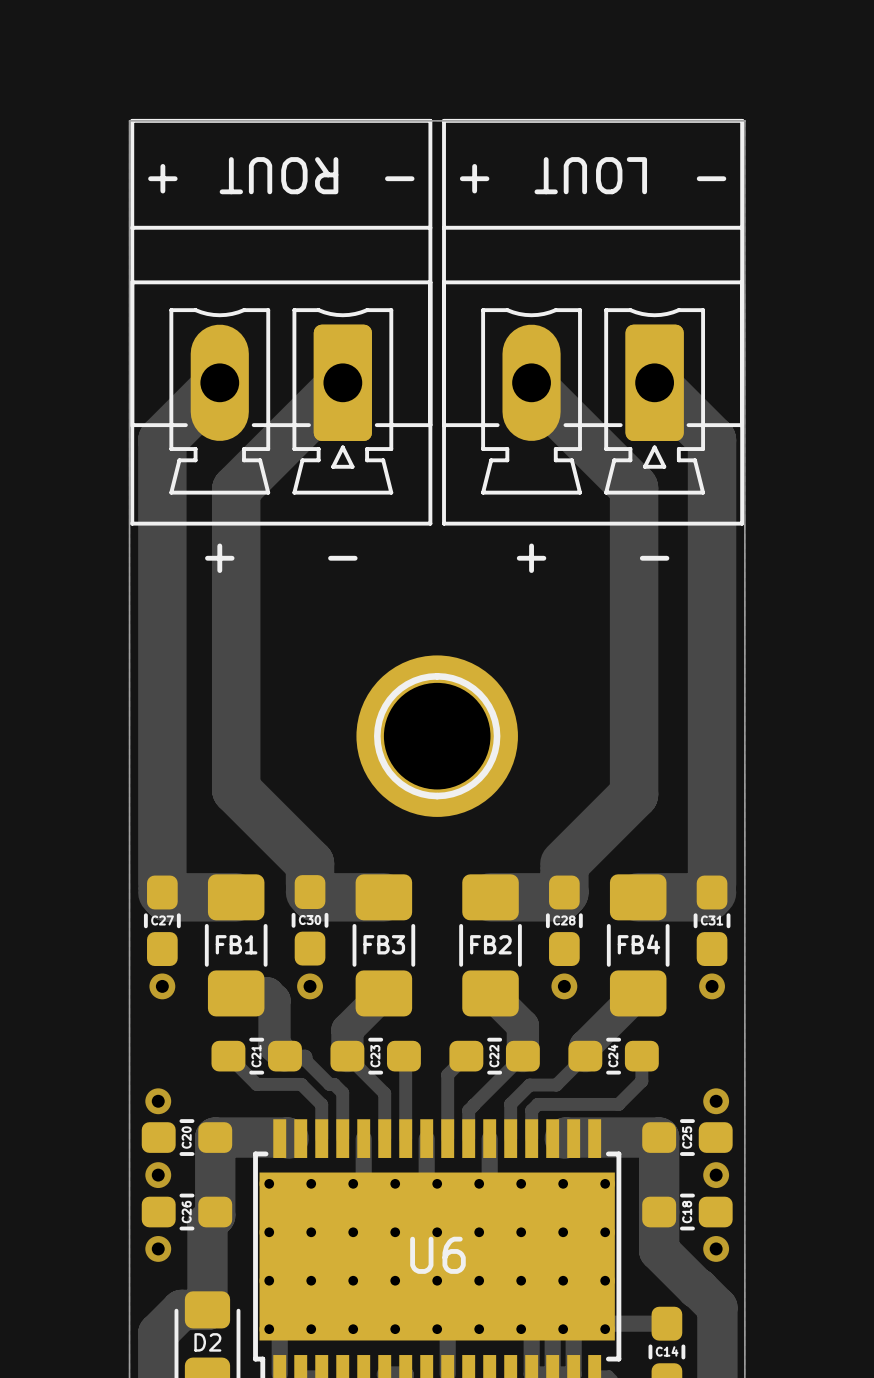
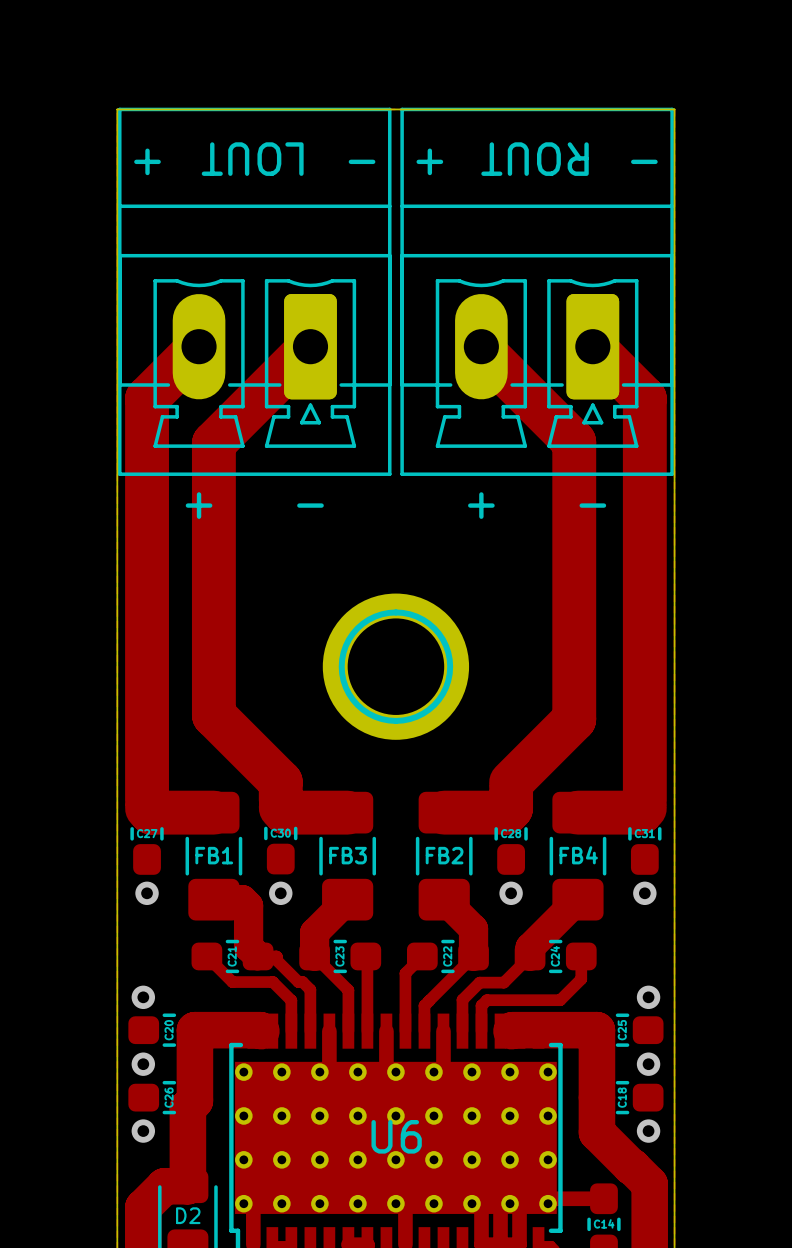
part value: ROUT (279, 175) -> LOUT (252, 159)
part value: LOUT (590, 175) -> ROUT (535, 159)

